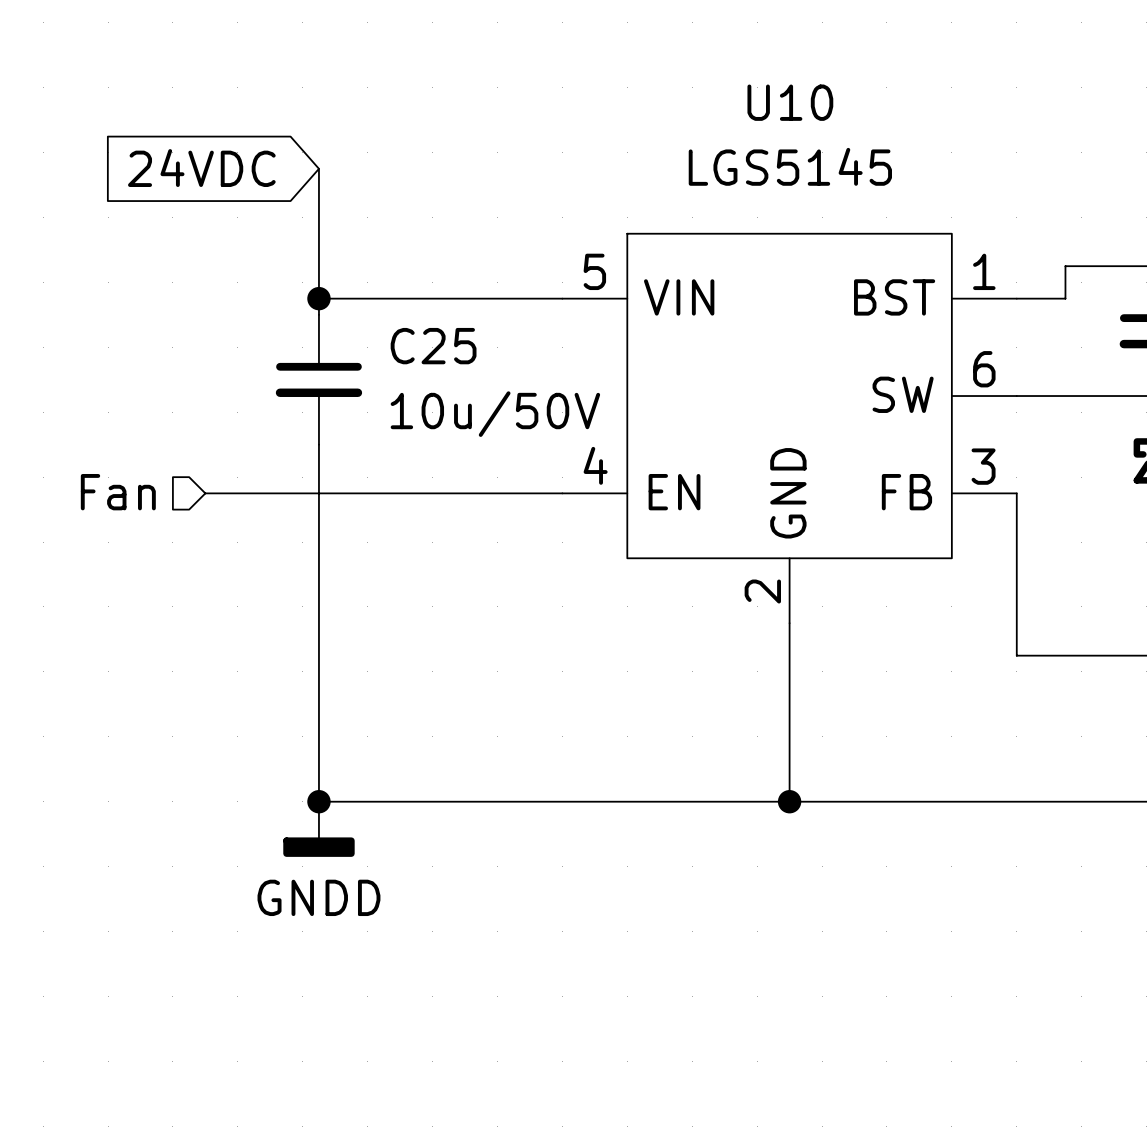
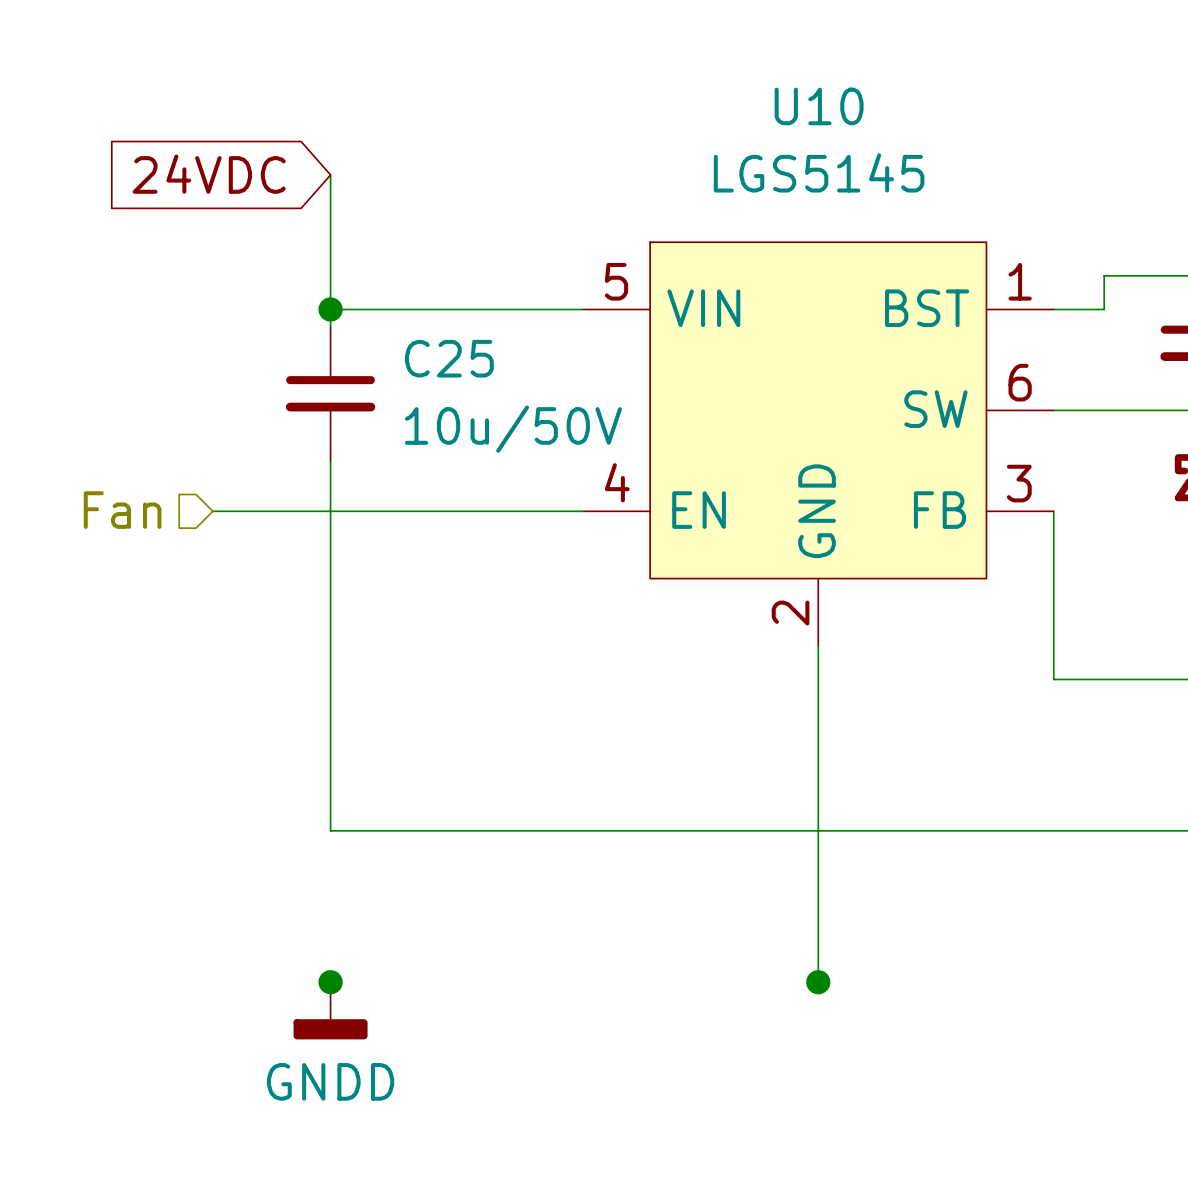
junction position: (318, 801) -> (330, 982)
wire: none -> (818, 830) (818, 982)
junction position: (789, 801) -> (818, 982)
power symbol position: GNDD (318, 829) -> GNDD (330, 1010)

